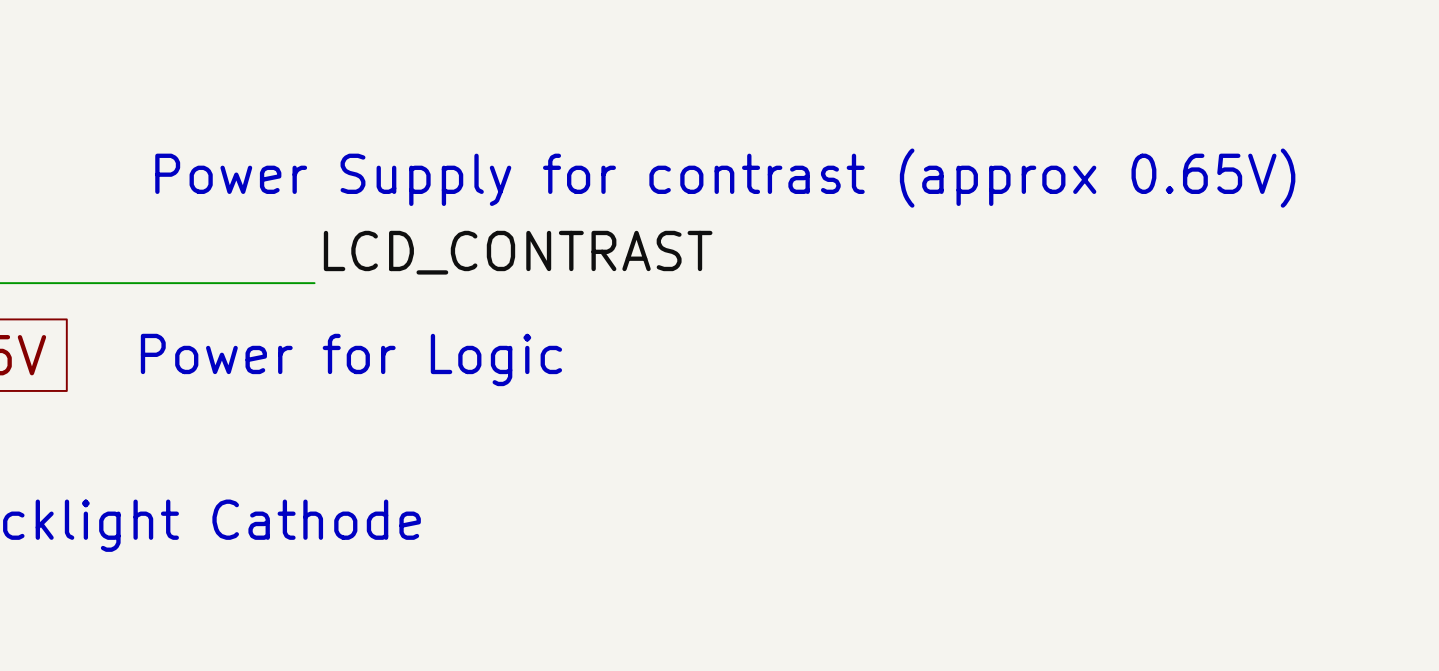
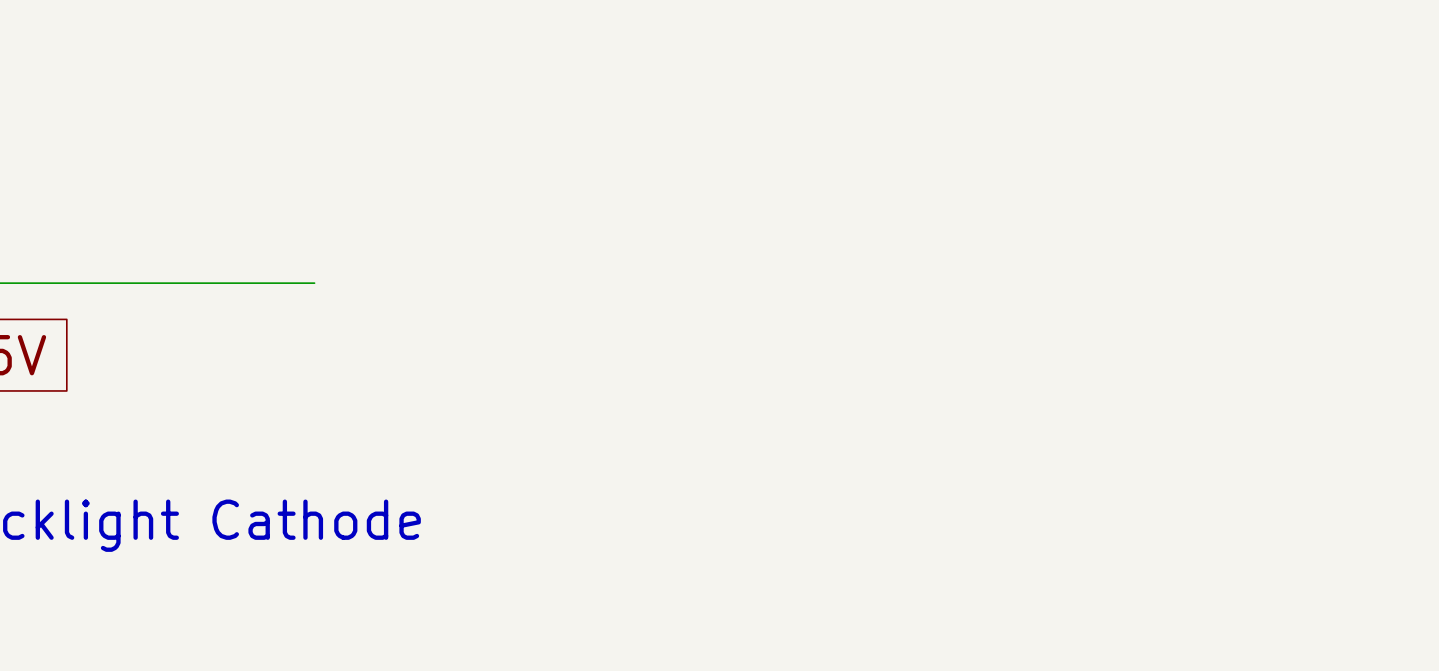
text: Power Supply for contrast (approx 0.65V) (725, 178) -> none
label: LCD_CONTRAST (518, 252) -> none
text: Power for Logic (351, 359) -> none

